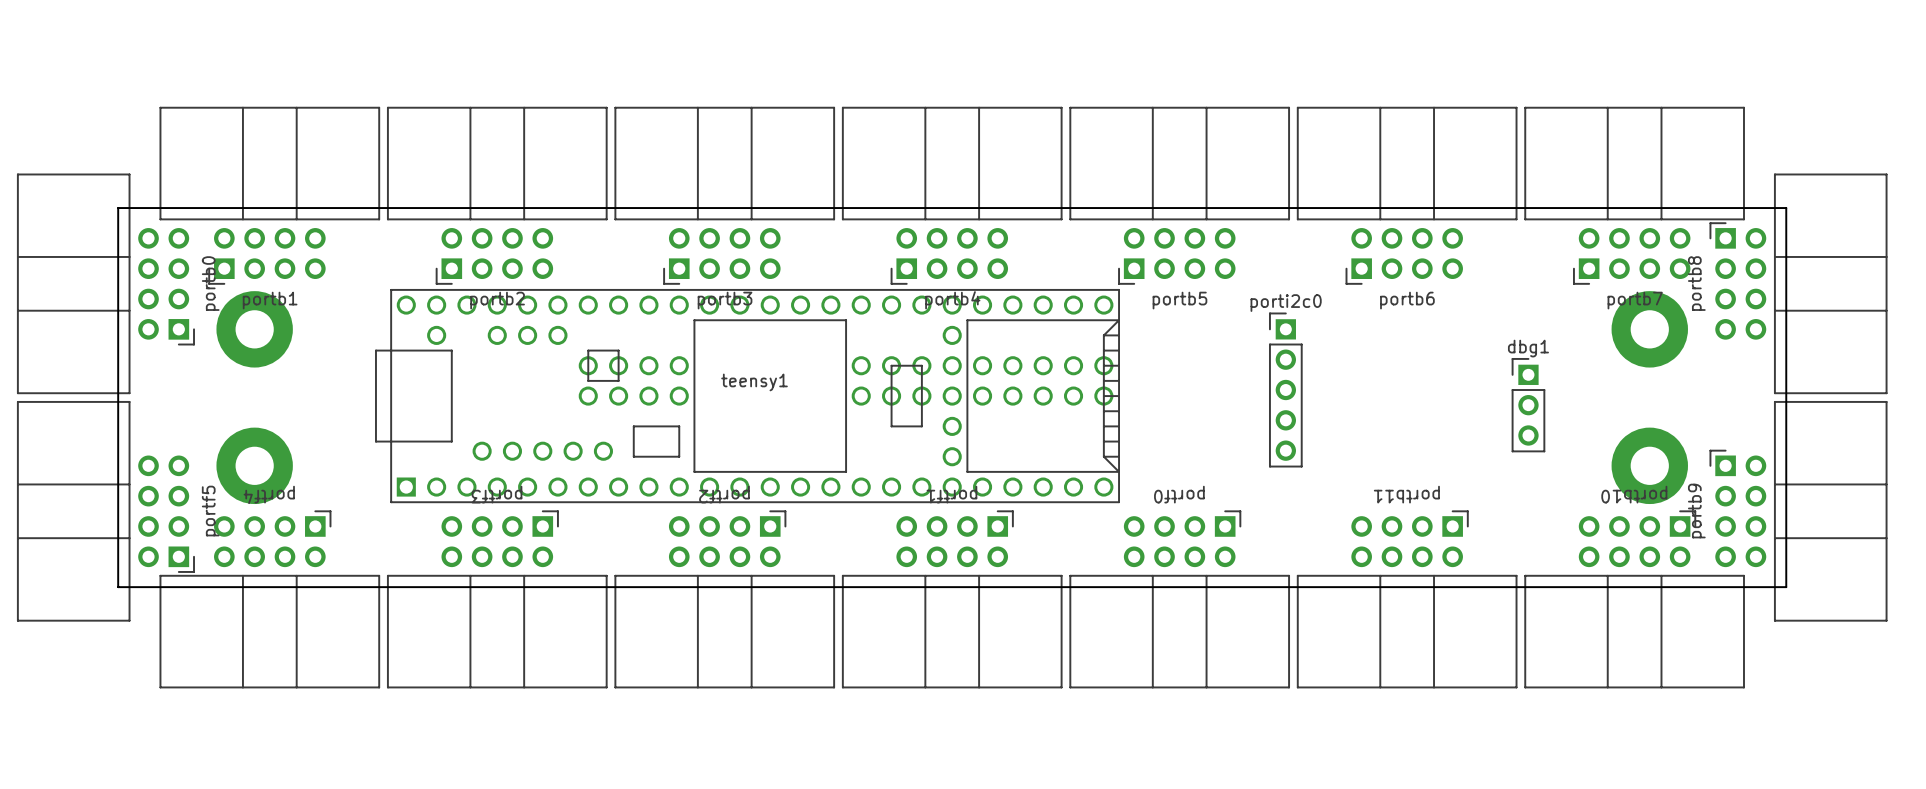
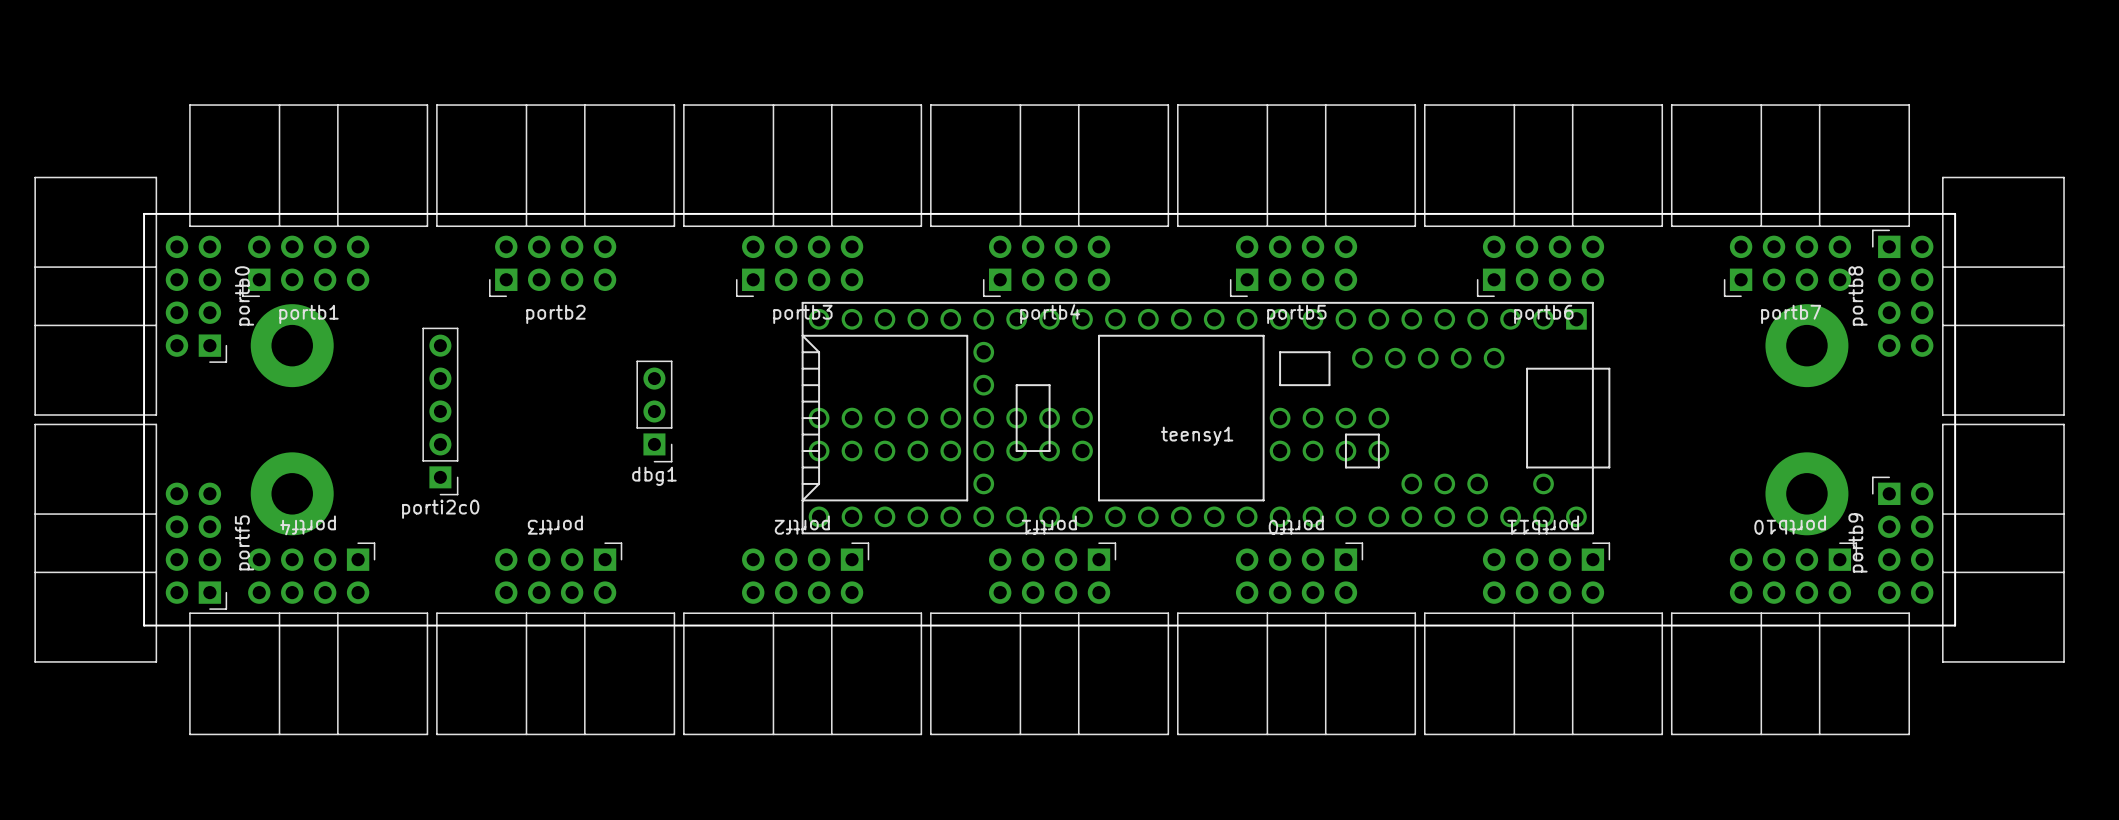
porti2c0 rotation: 0° (1285, 390) -> 180° (440, 411)
porti2c0 position: (1285, 390) -> (440, 411)
teensy1 rotation: 0° (747, 396) -> 180° (1205, 418)
dbg1 rotation: 0° (1528, 405) -> 180° (654, 411)
dbg1 position: (1528, 405) -> (654, 411)

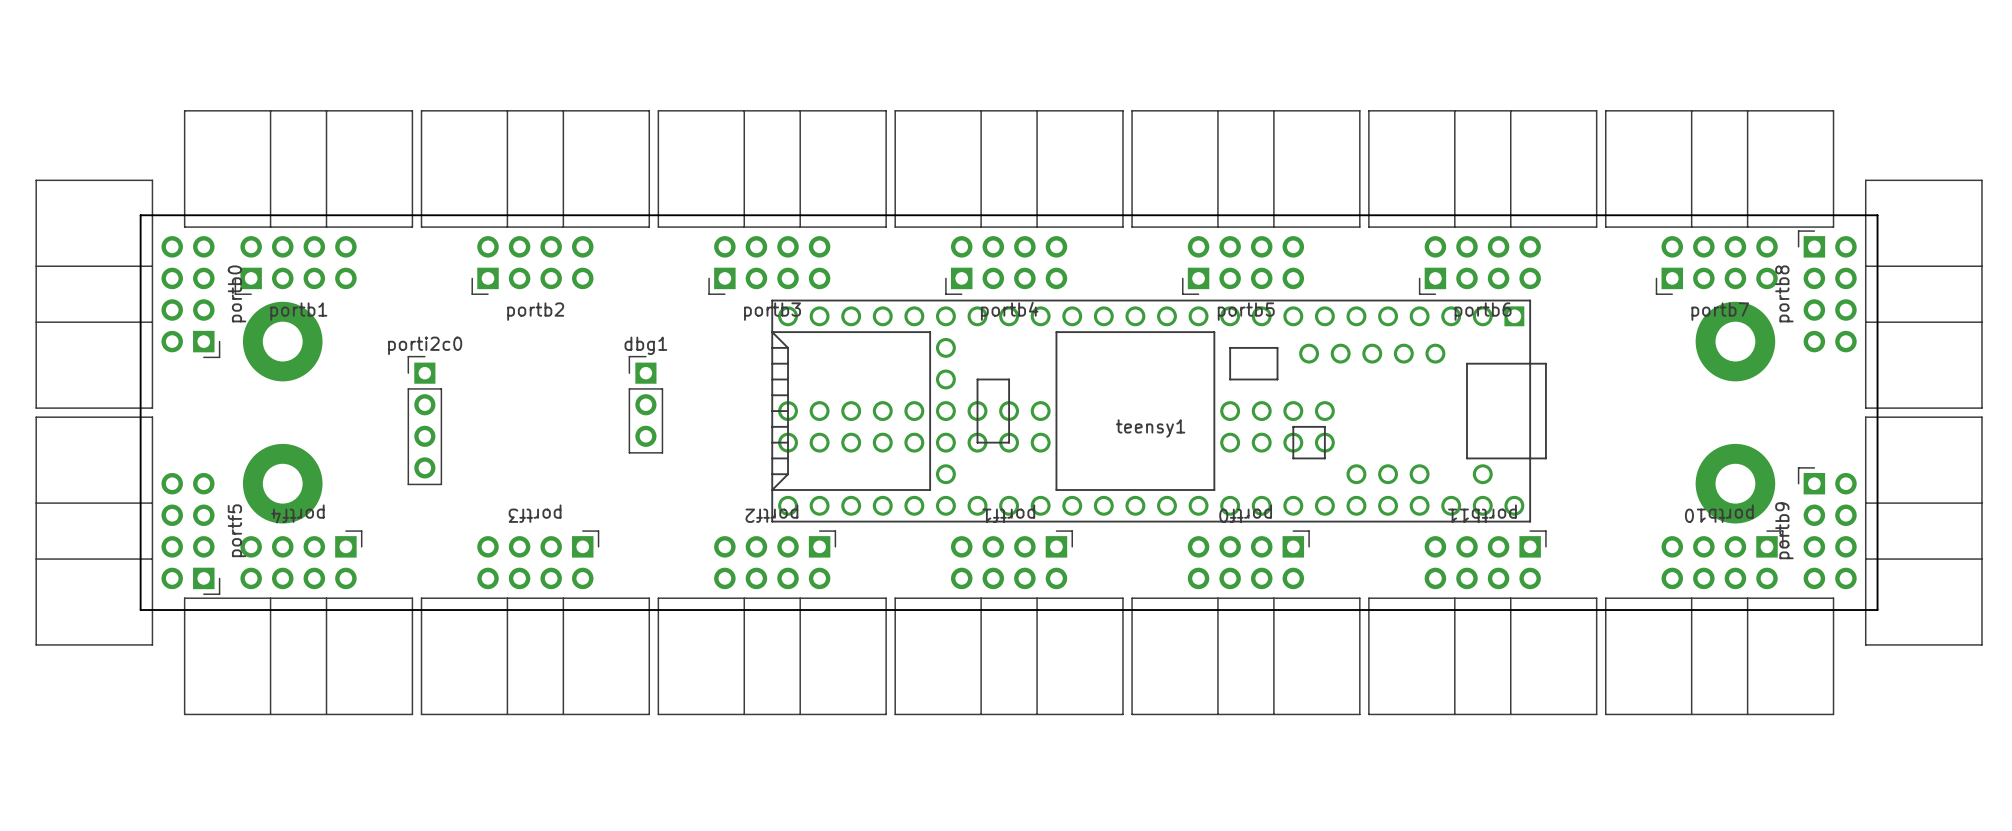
porti2c0 footprint: [422, 327, 459, 496] -> [407, 355, 443, 486]
dbg1 rotation: 0° (654, 411) -> 180° (645, 404)
porti2c0 name position: porti2c0 (440, 509) -> porti2c0 (425, 345)

